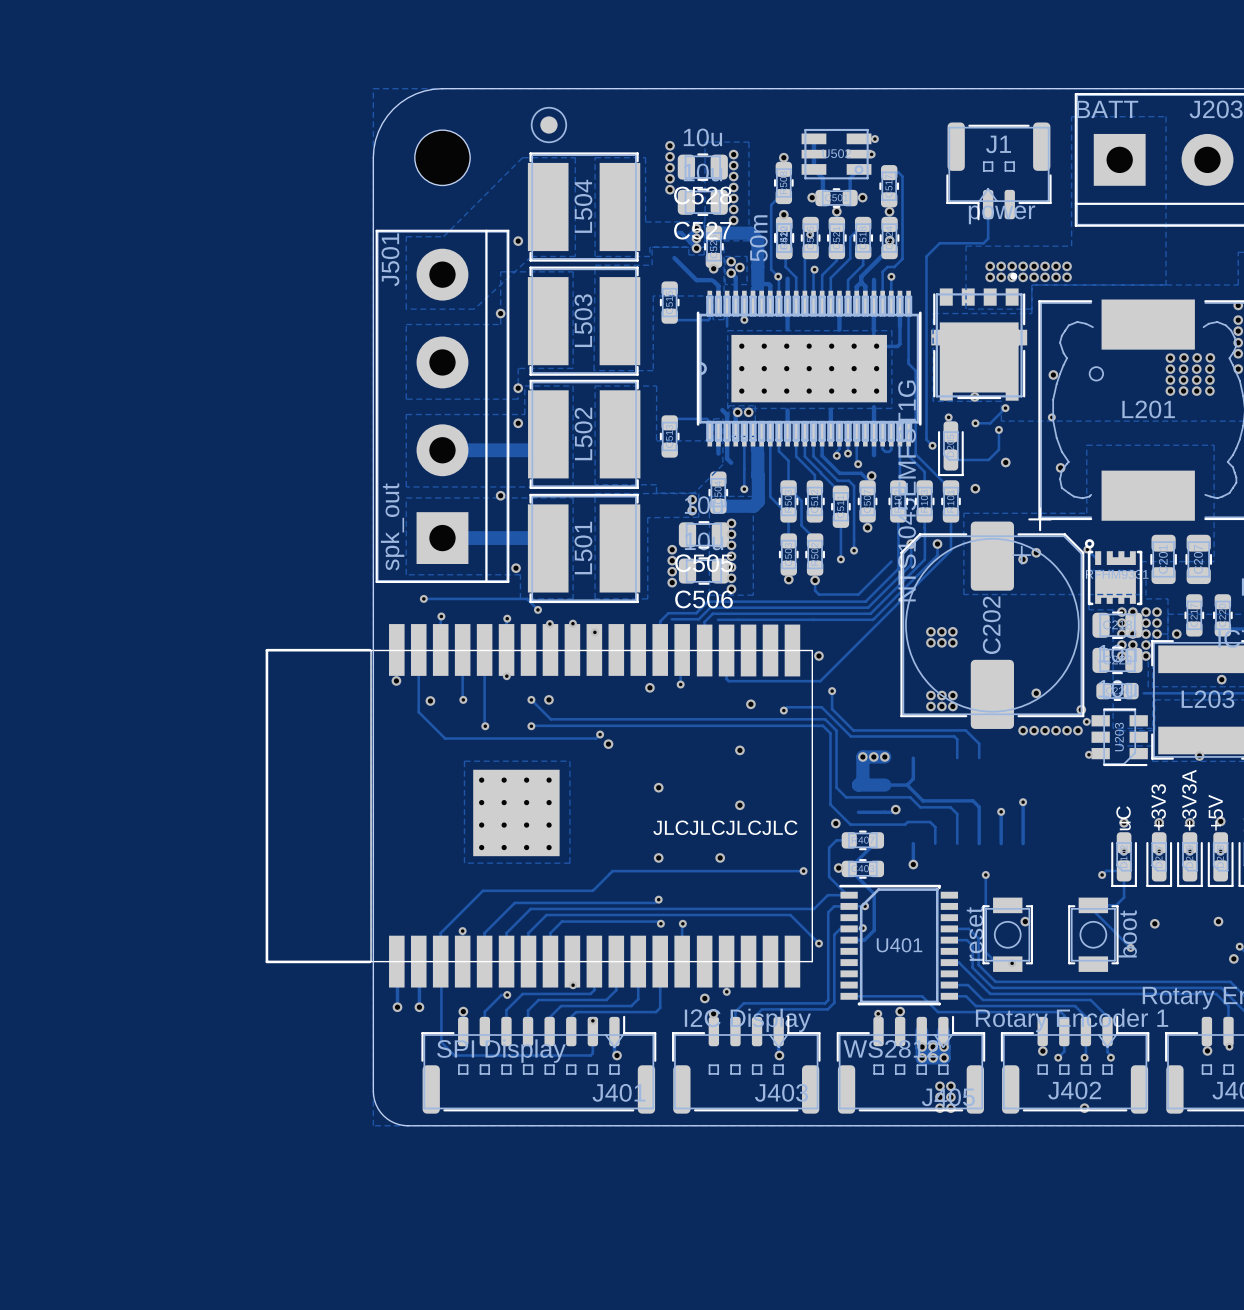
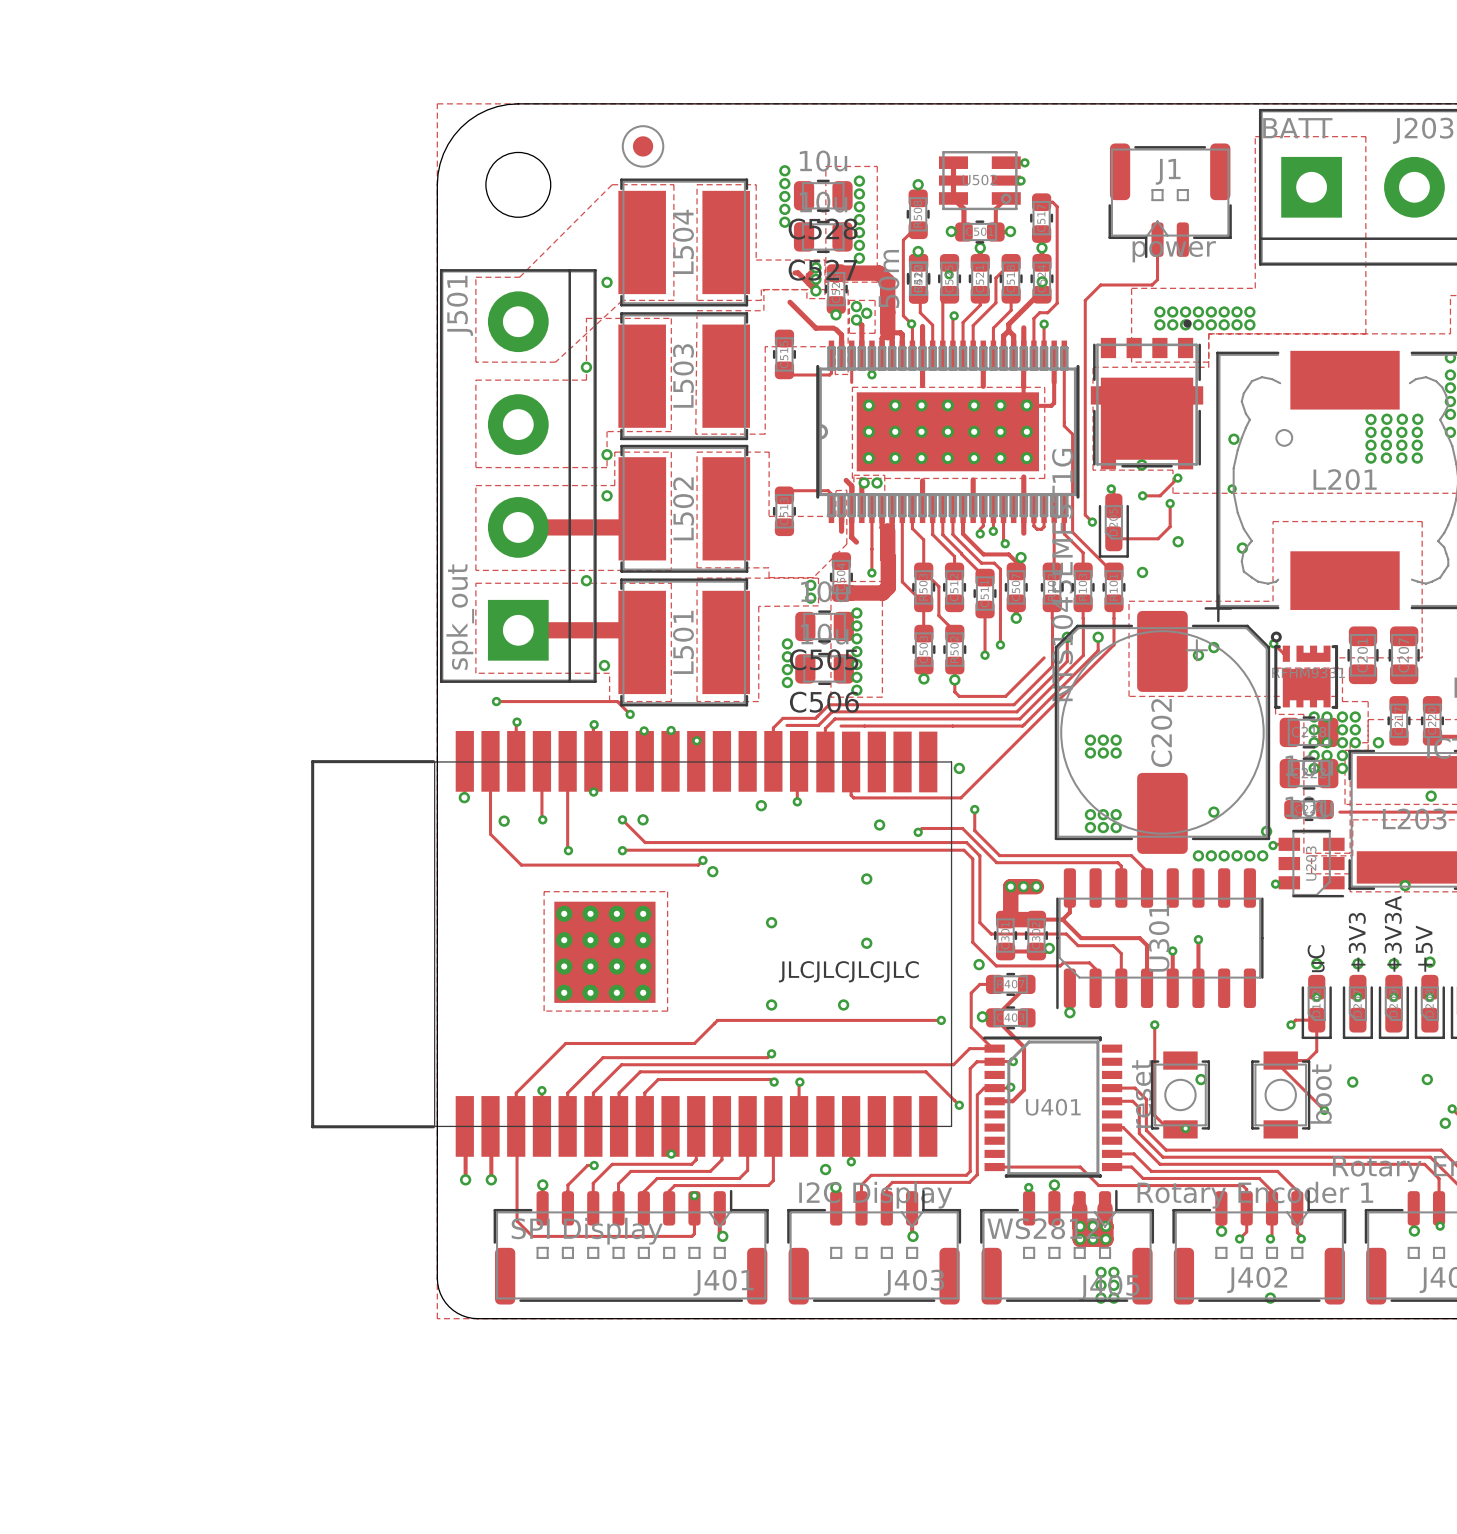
part: none -> (1005, 935)
part: none -> (1036, 935)
U301: none -> (1159, 938)

